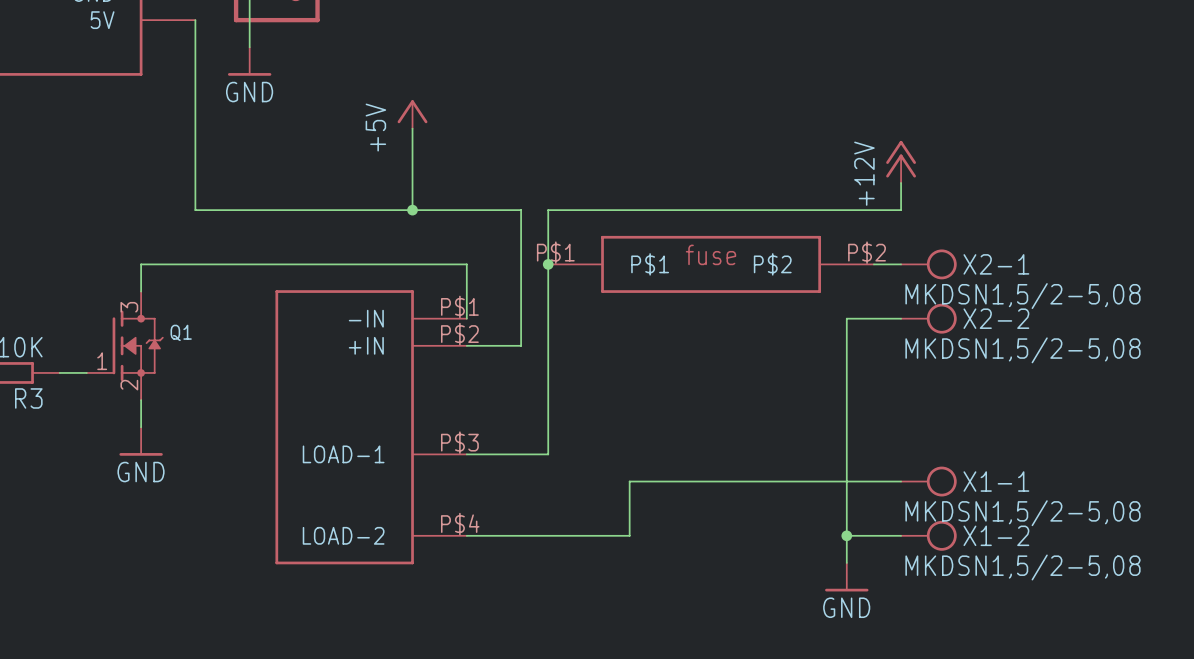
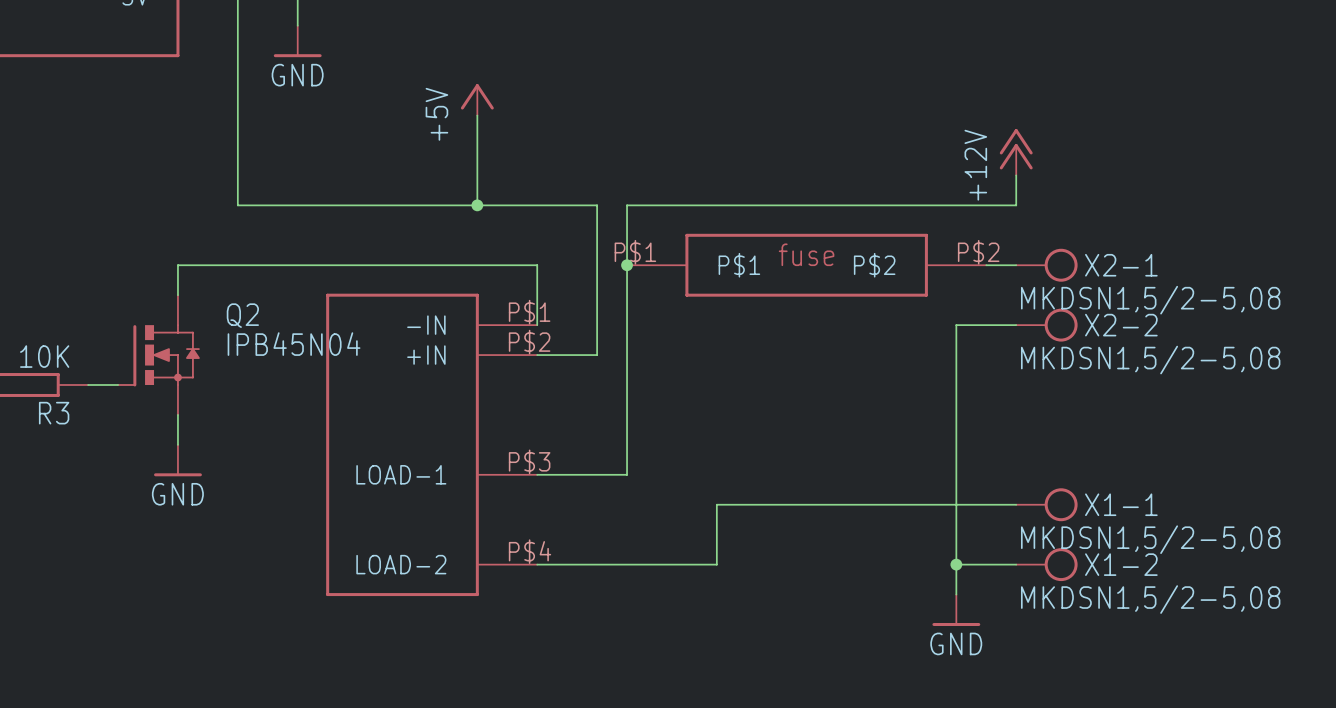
Q2: none -> IPB45N04 (158, 355)
Q1: (125, 345) -> none

